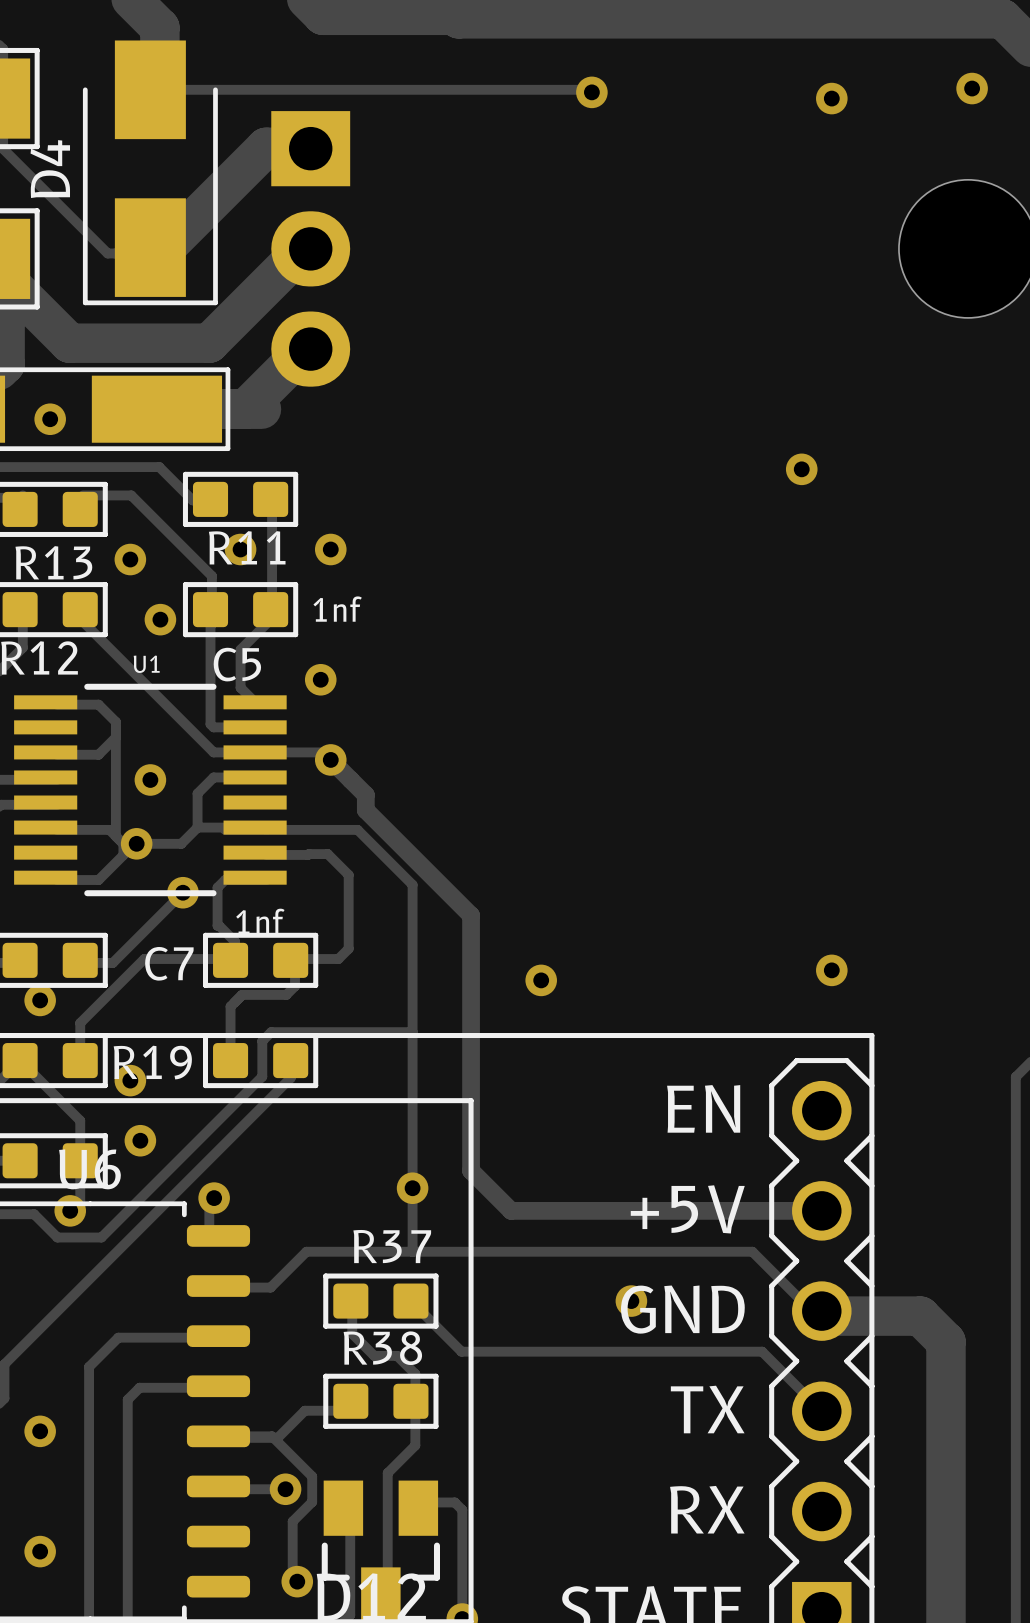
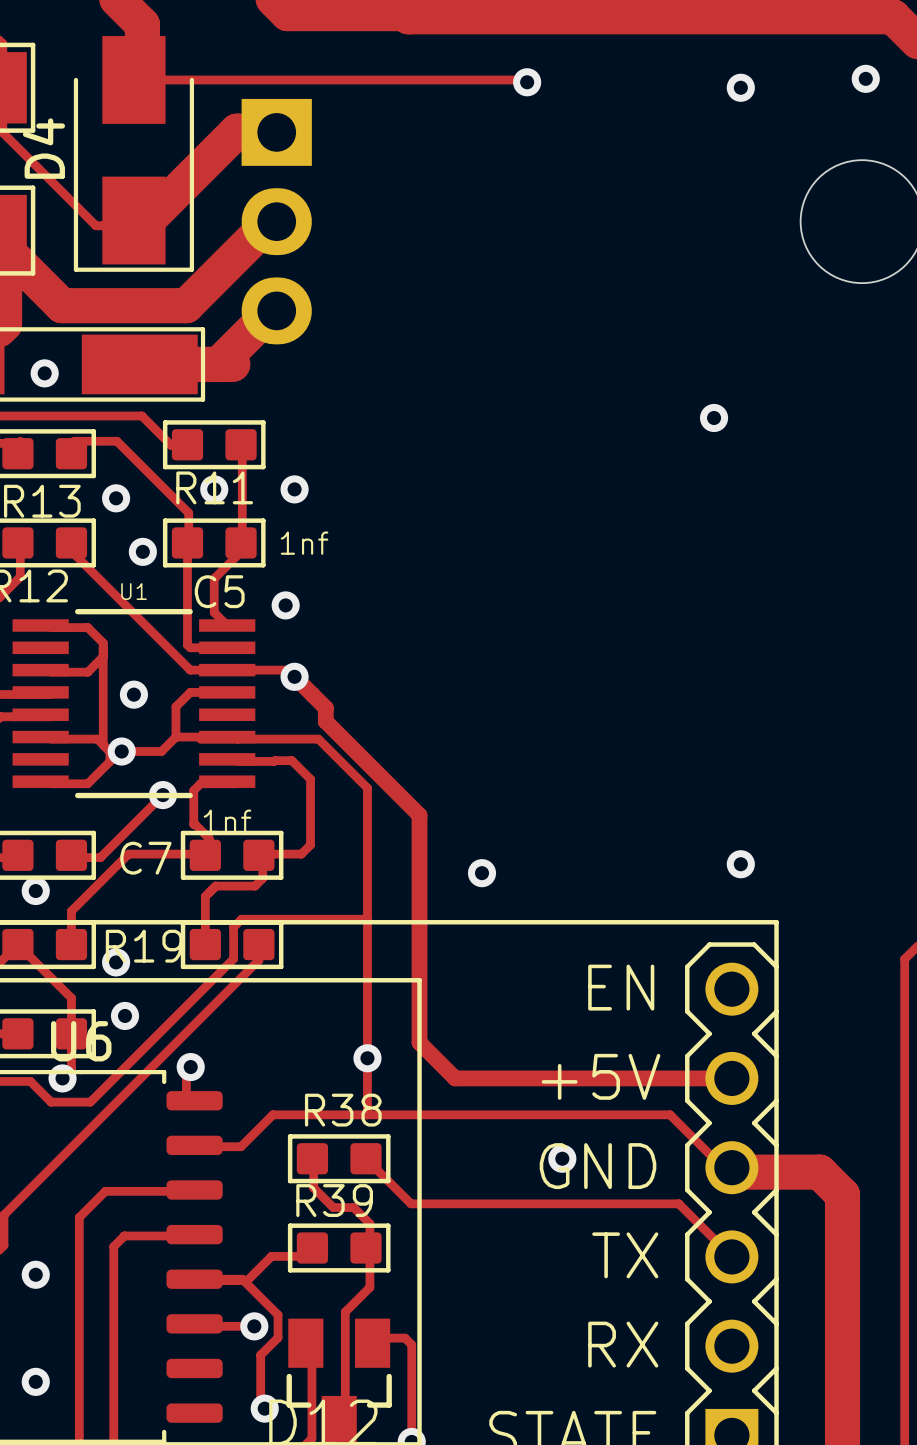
R37 name: R37 (392, 1246) -> R38 (343, 1110)
R38 name: R38 (382, 1348) -> R39 (334, 1200)

